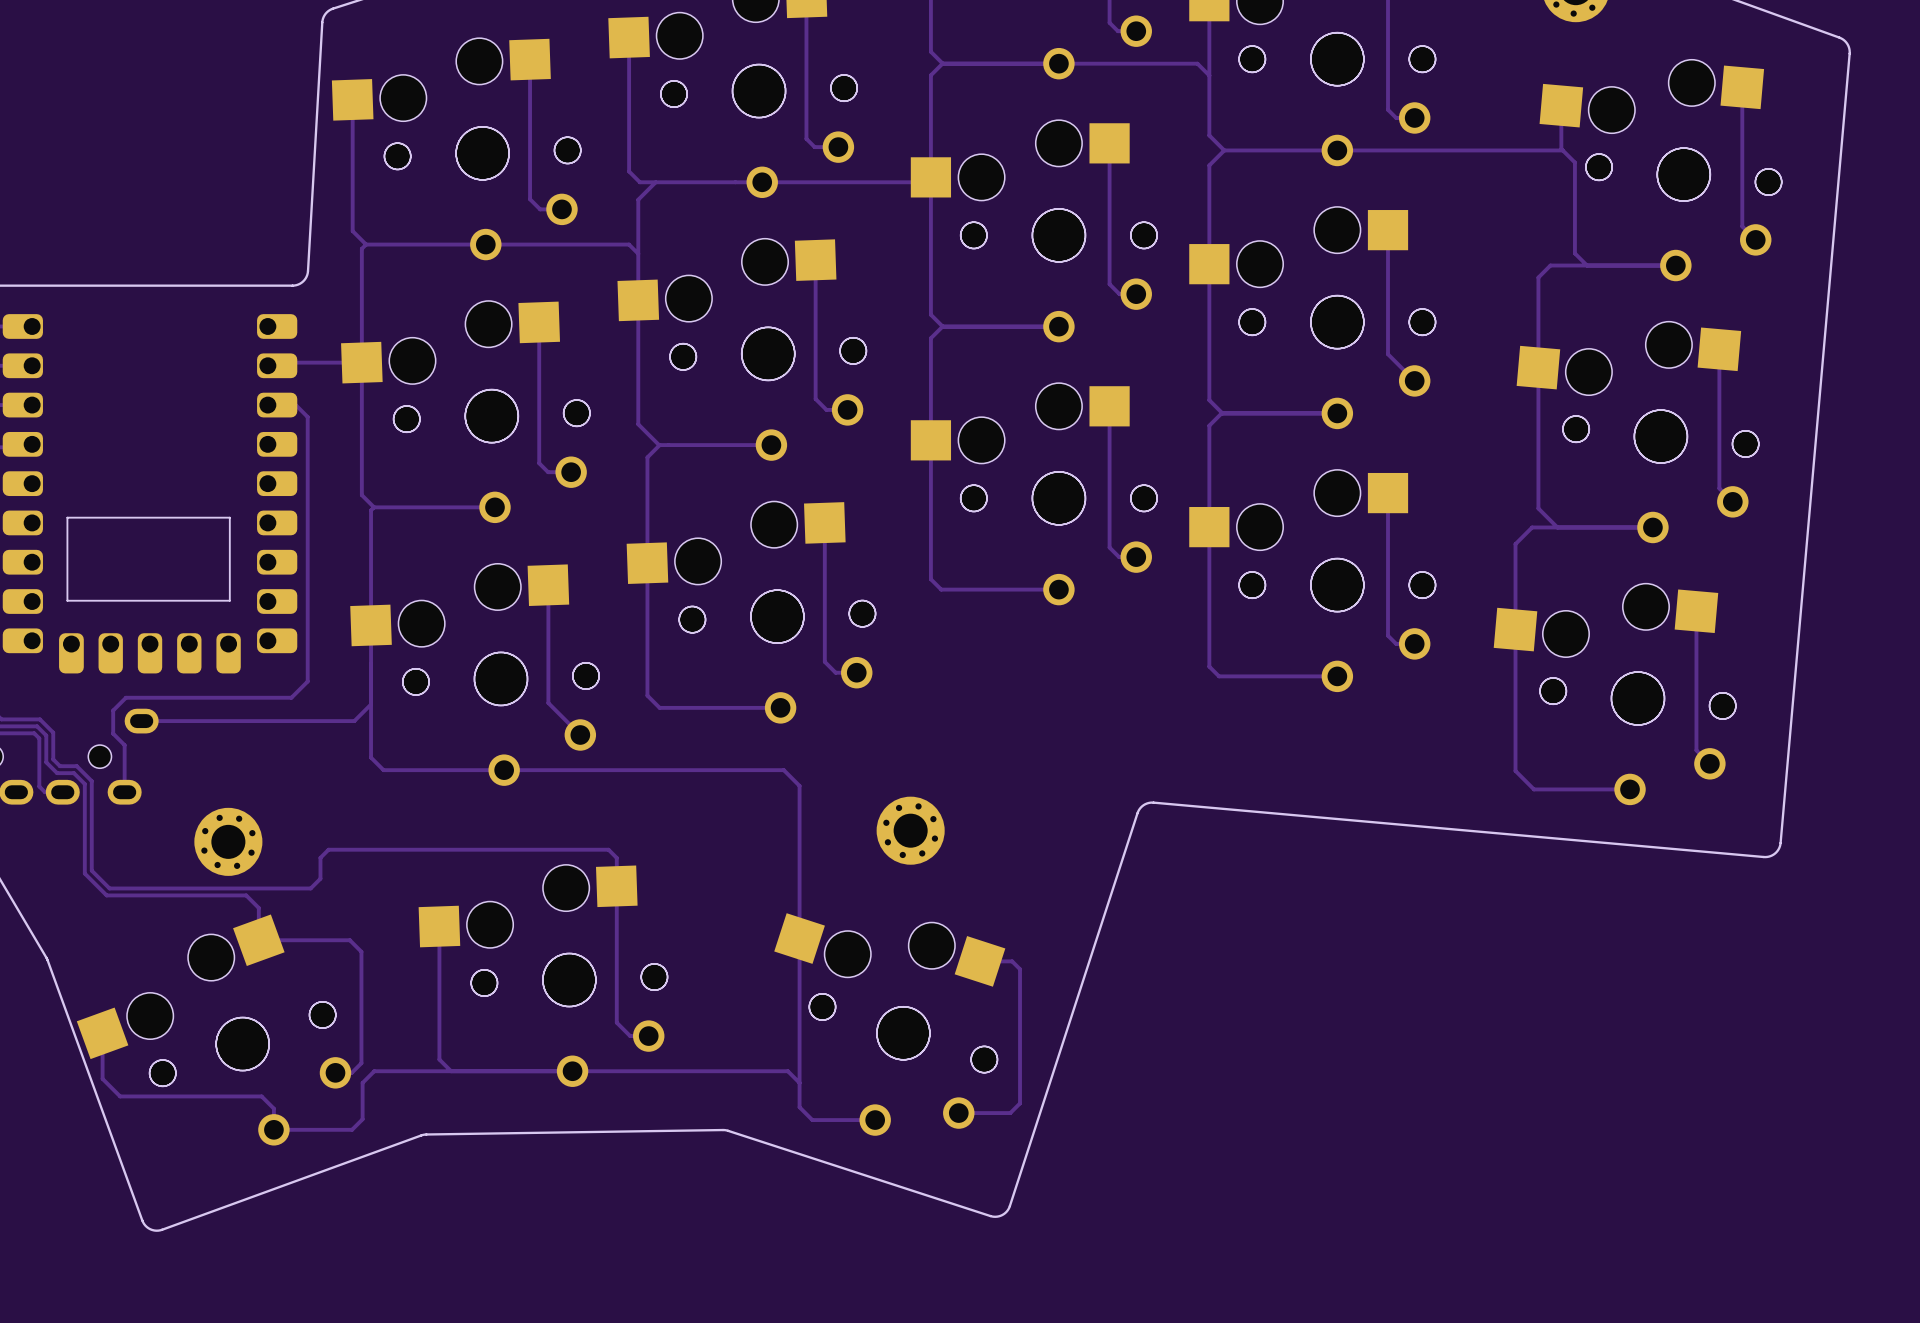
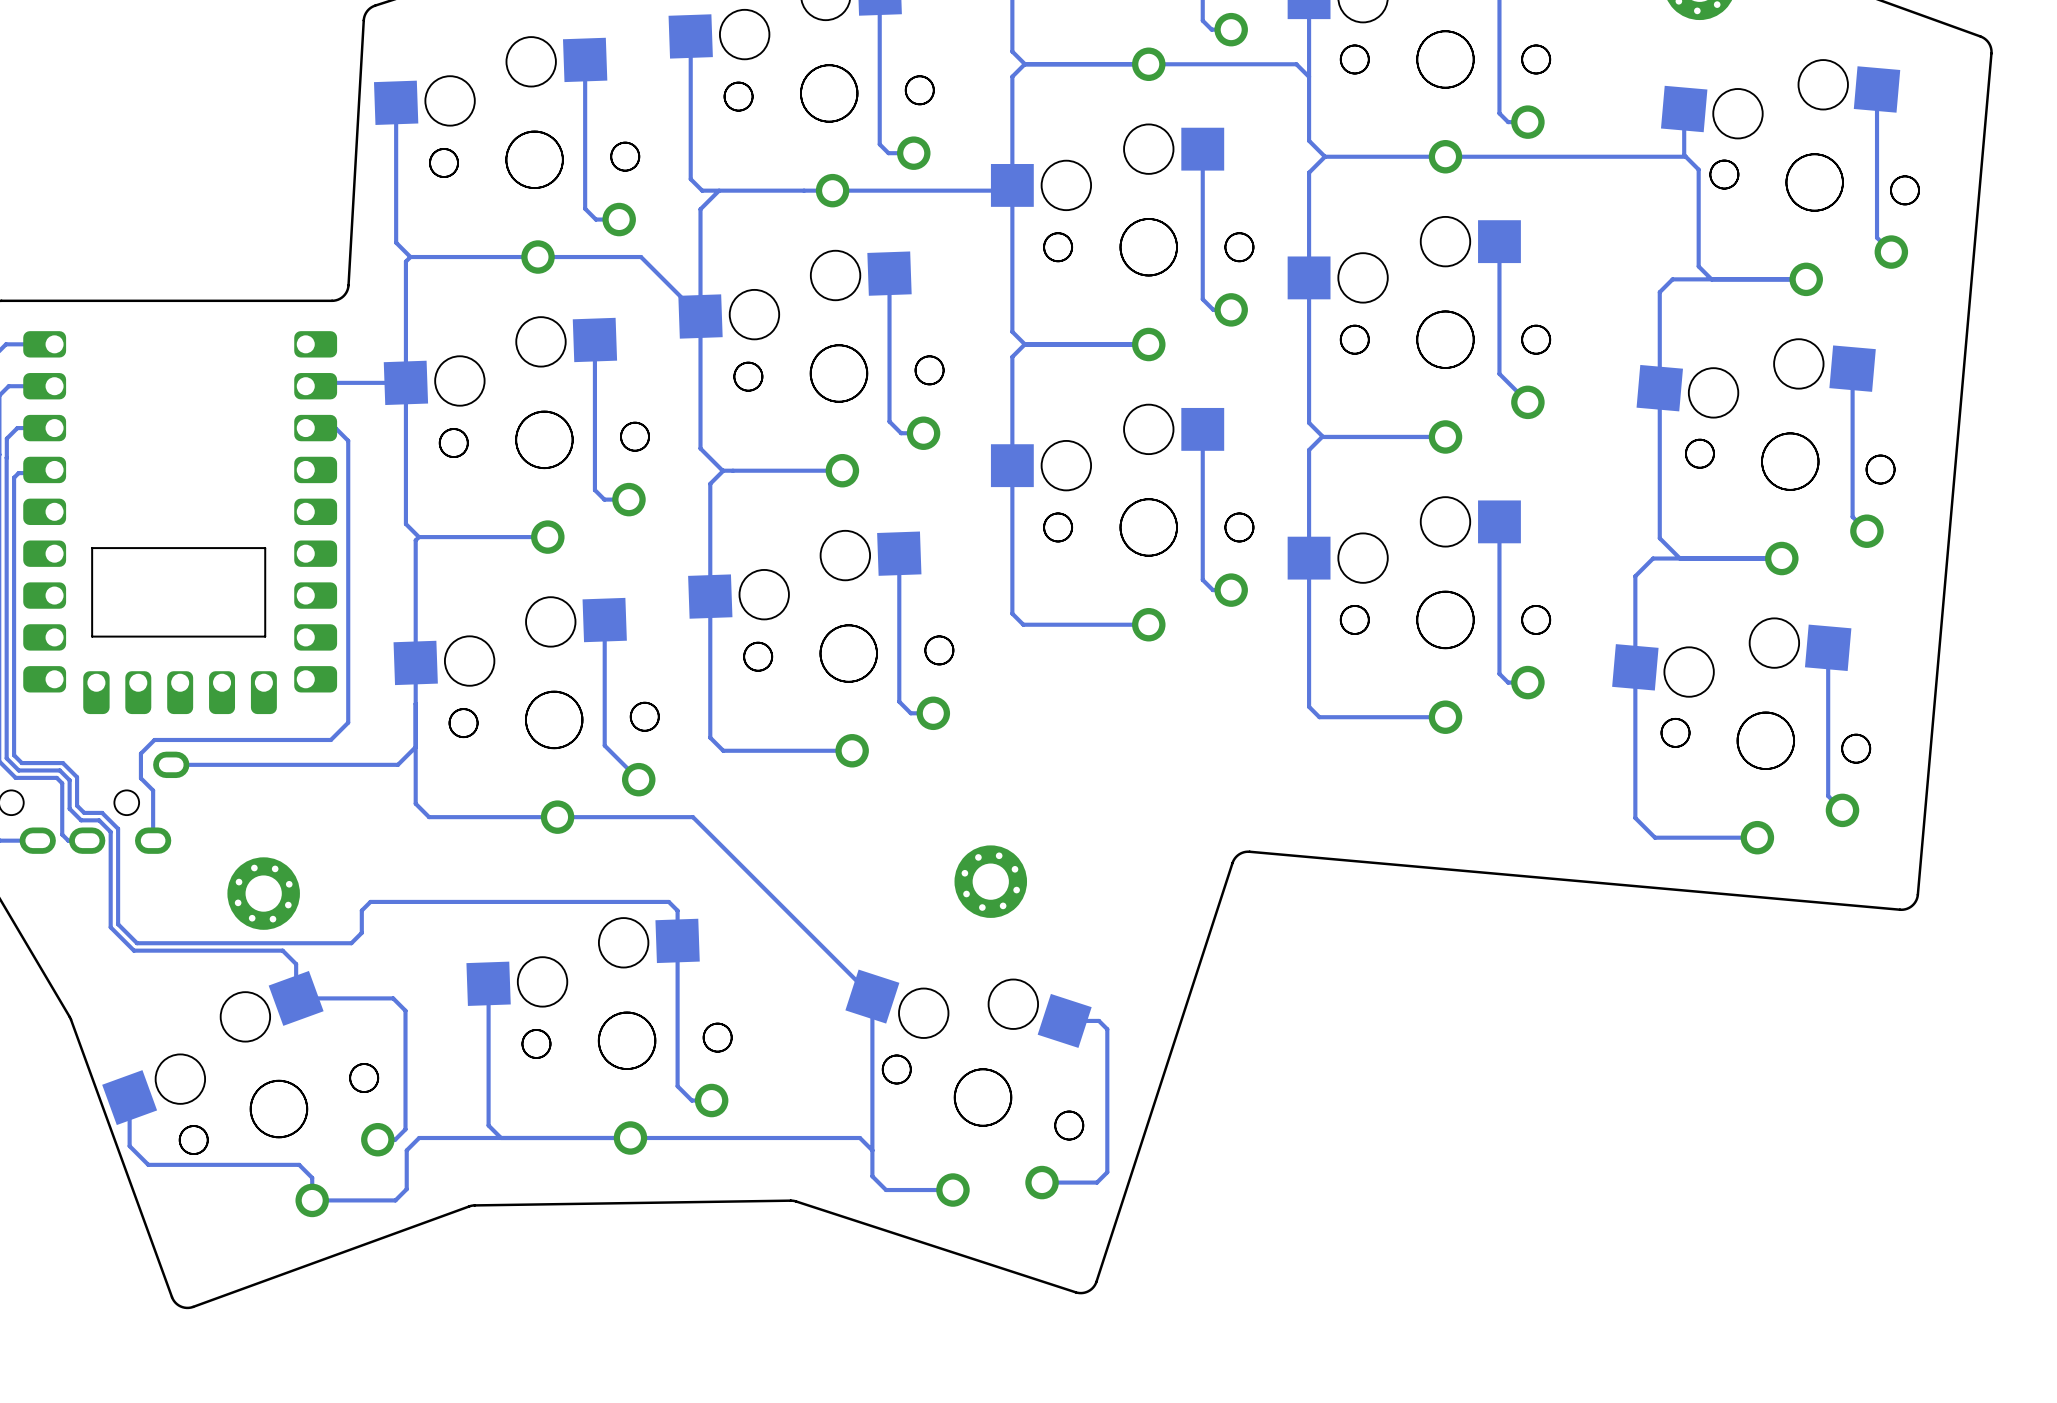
track: (582, 244) (629, 244) (638, 253) -> (641, 257) (700, 316)
track: (631, 770) (783, 770) (799, 785) (799, 938) -> (692, 817) (872, 996)

